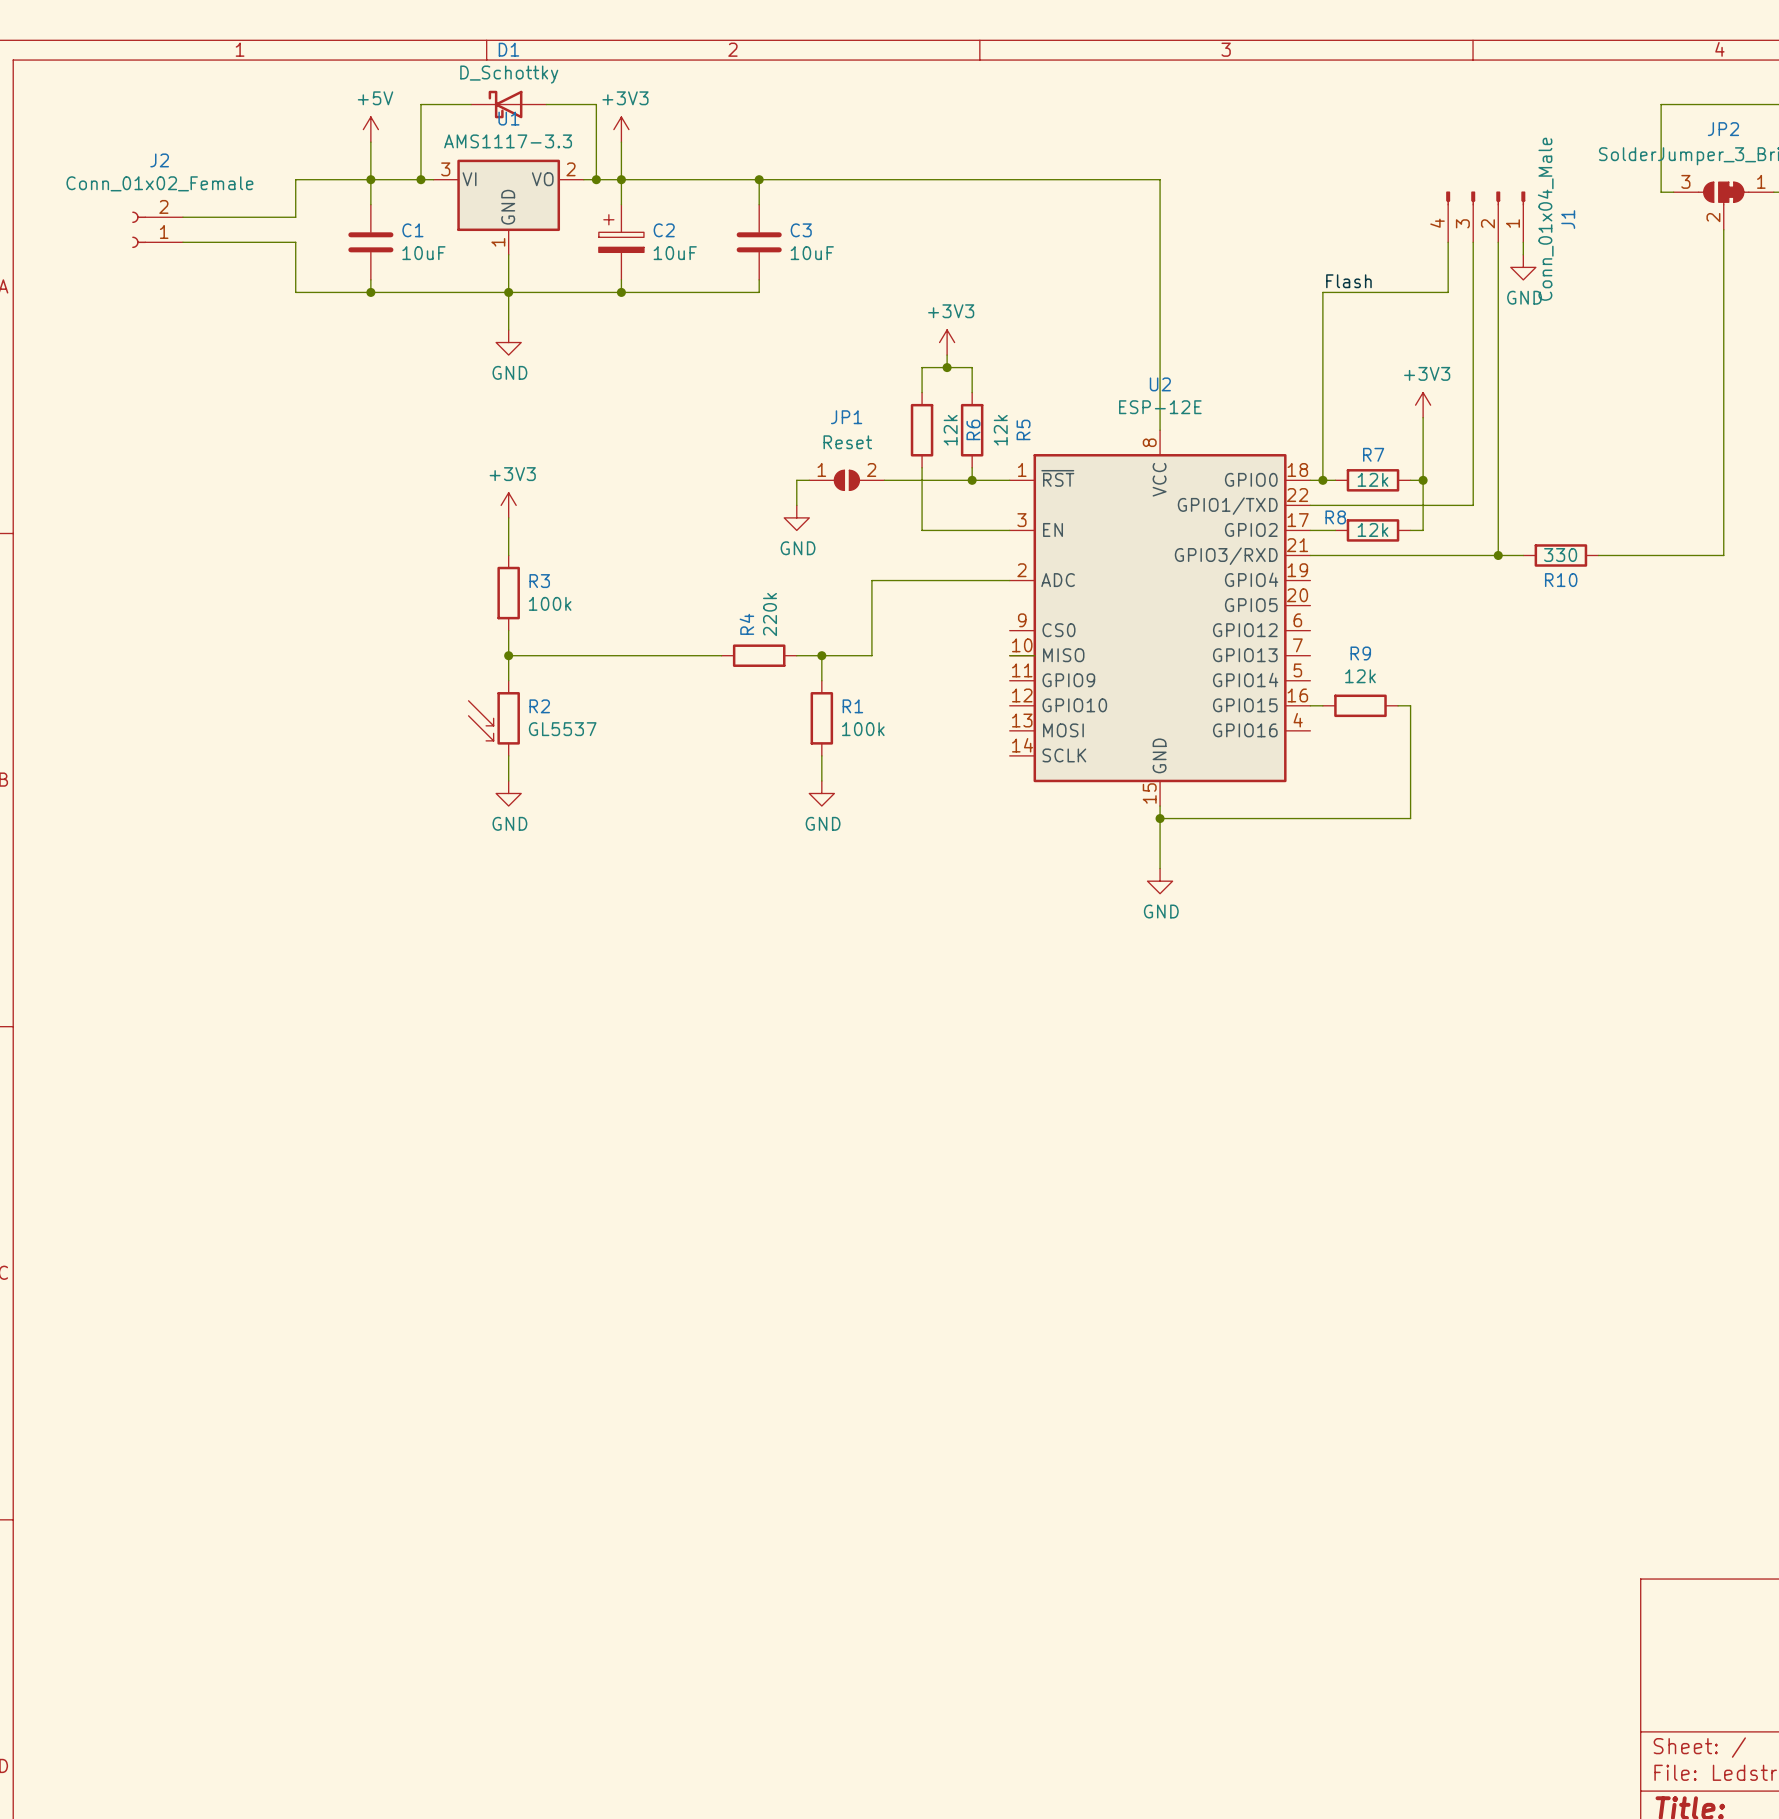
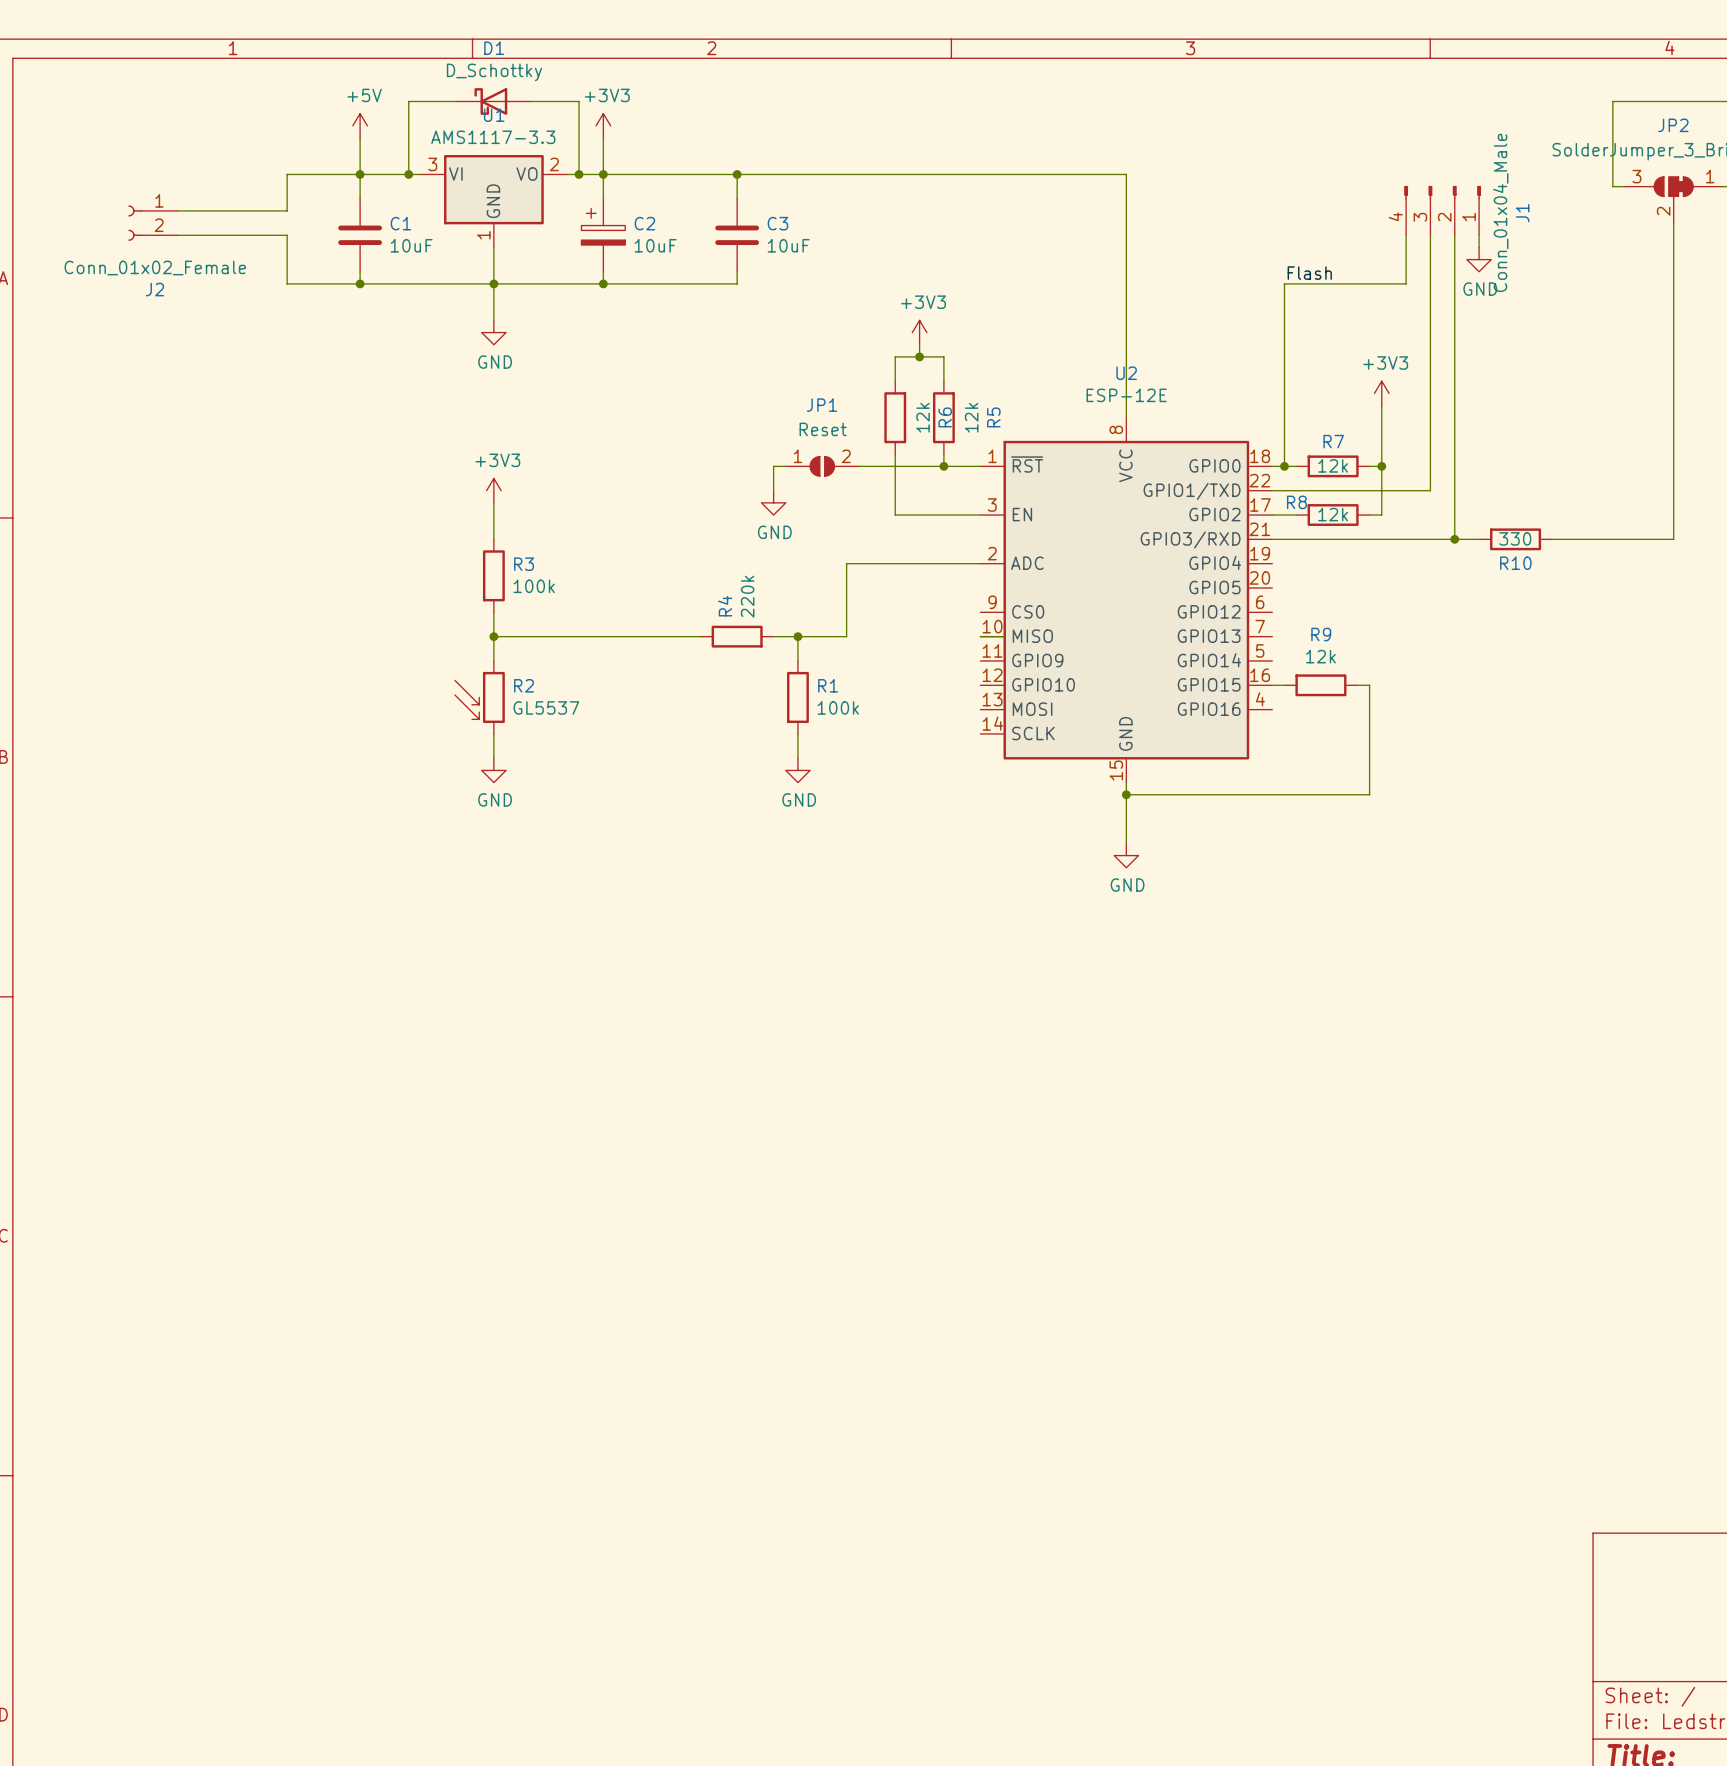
J2 flip: as is (139, 229) -> up-down (135, 223)

